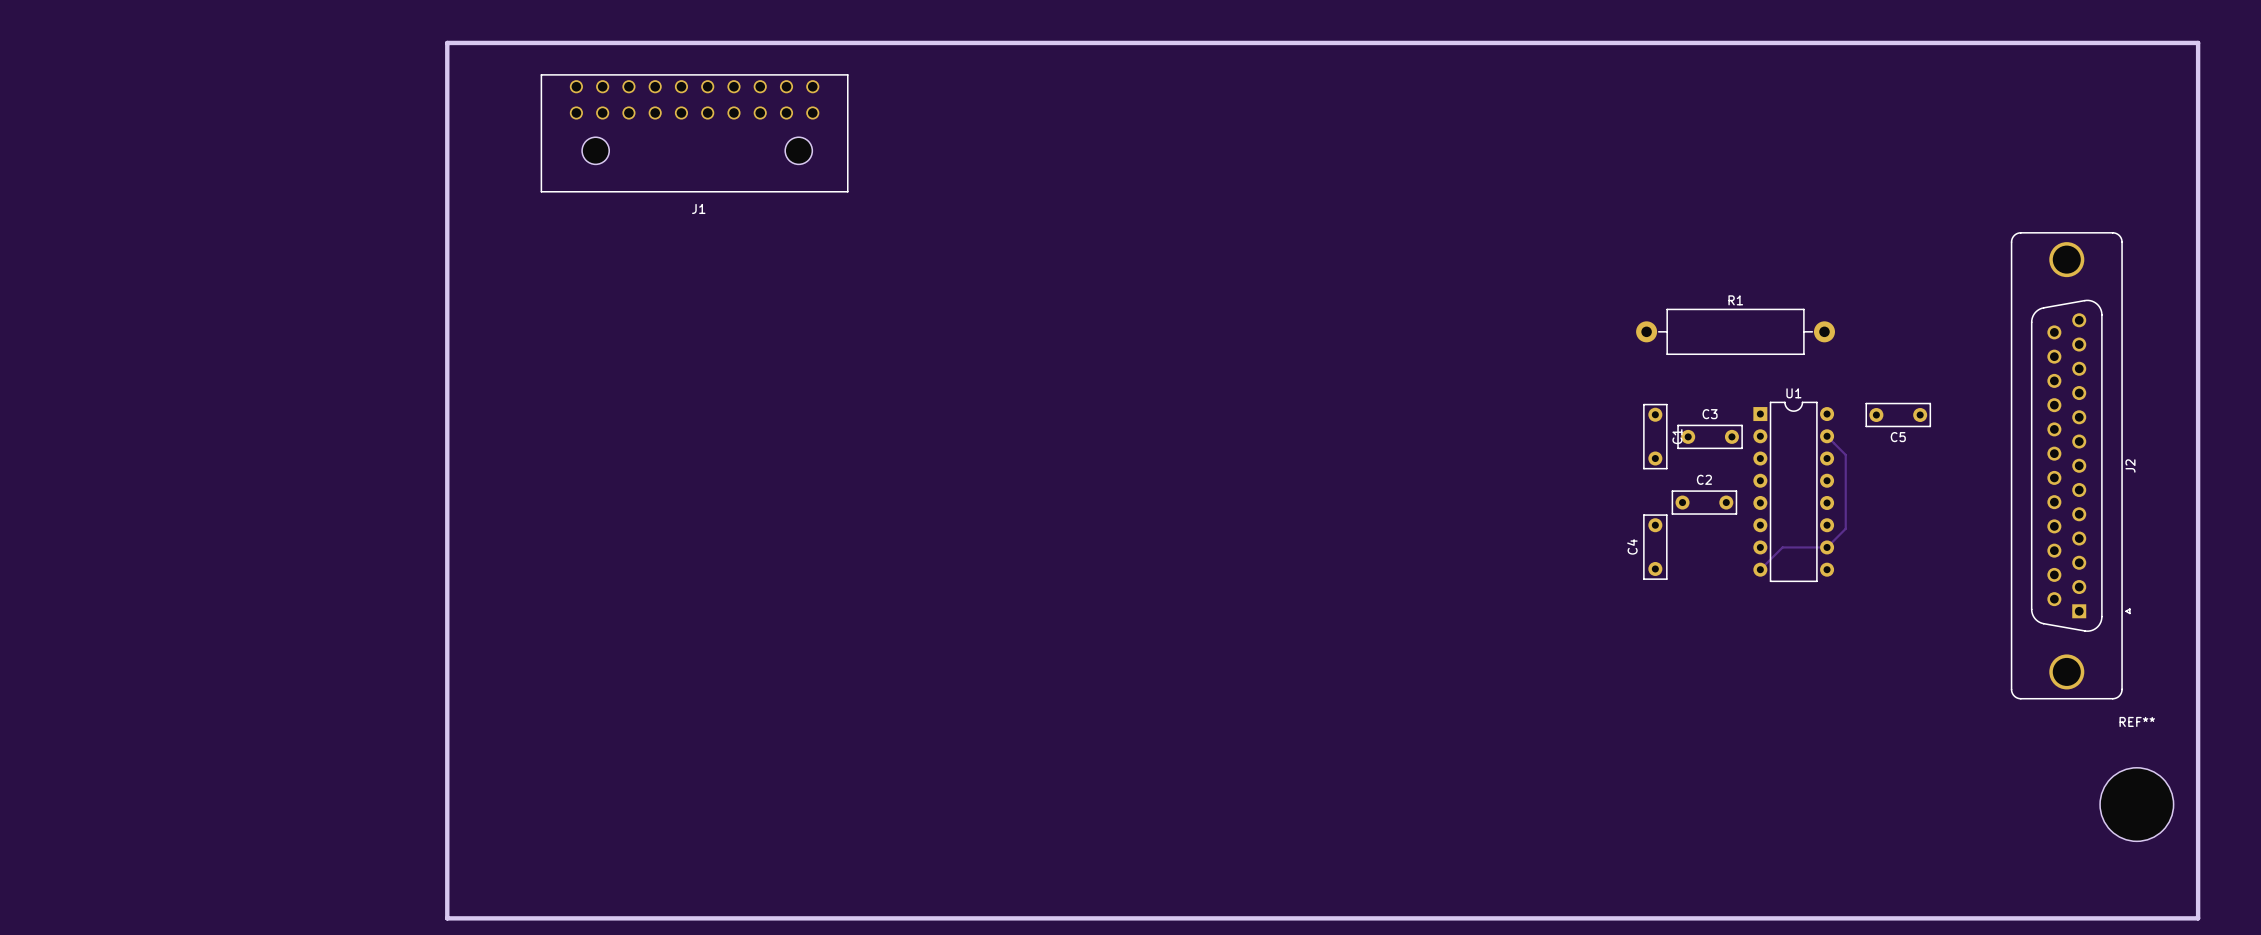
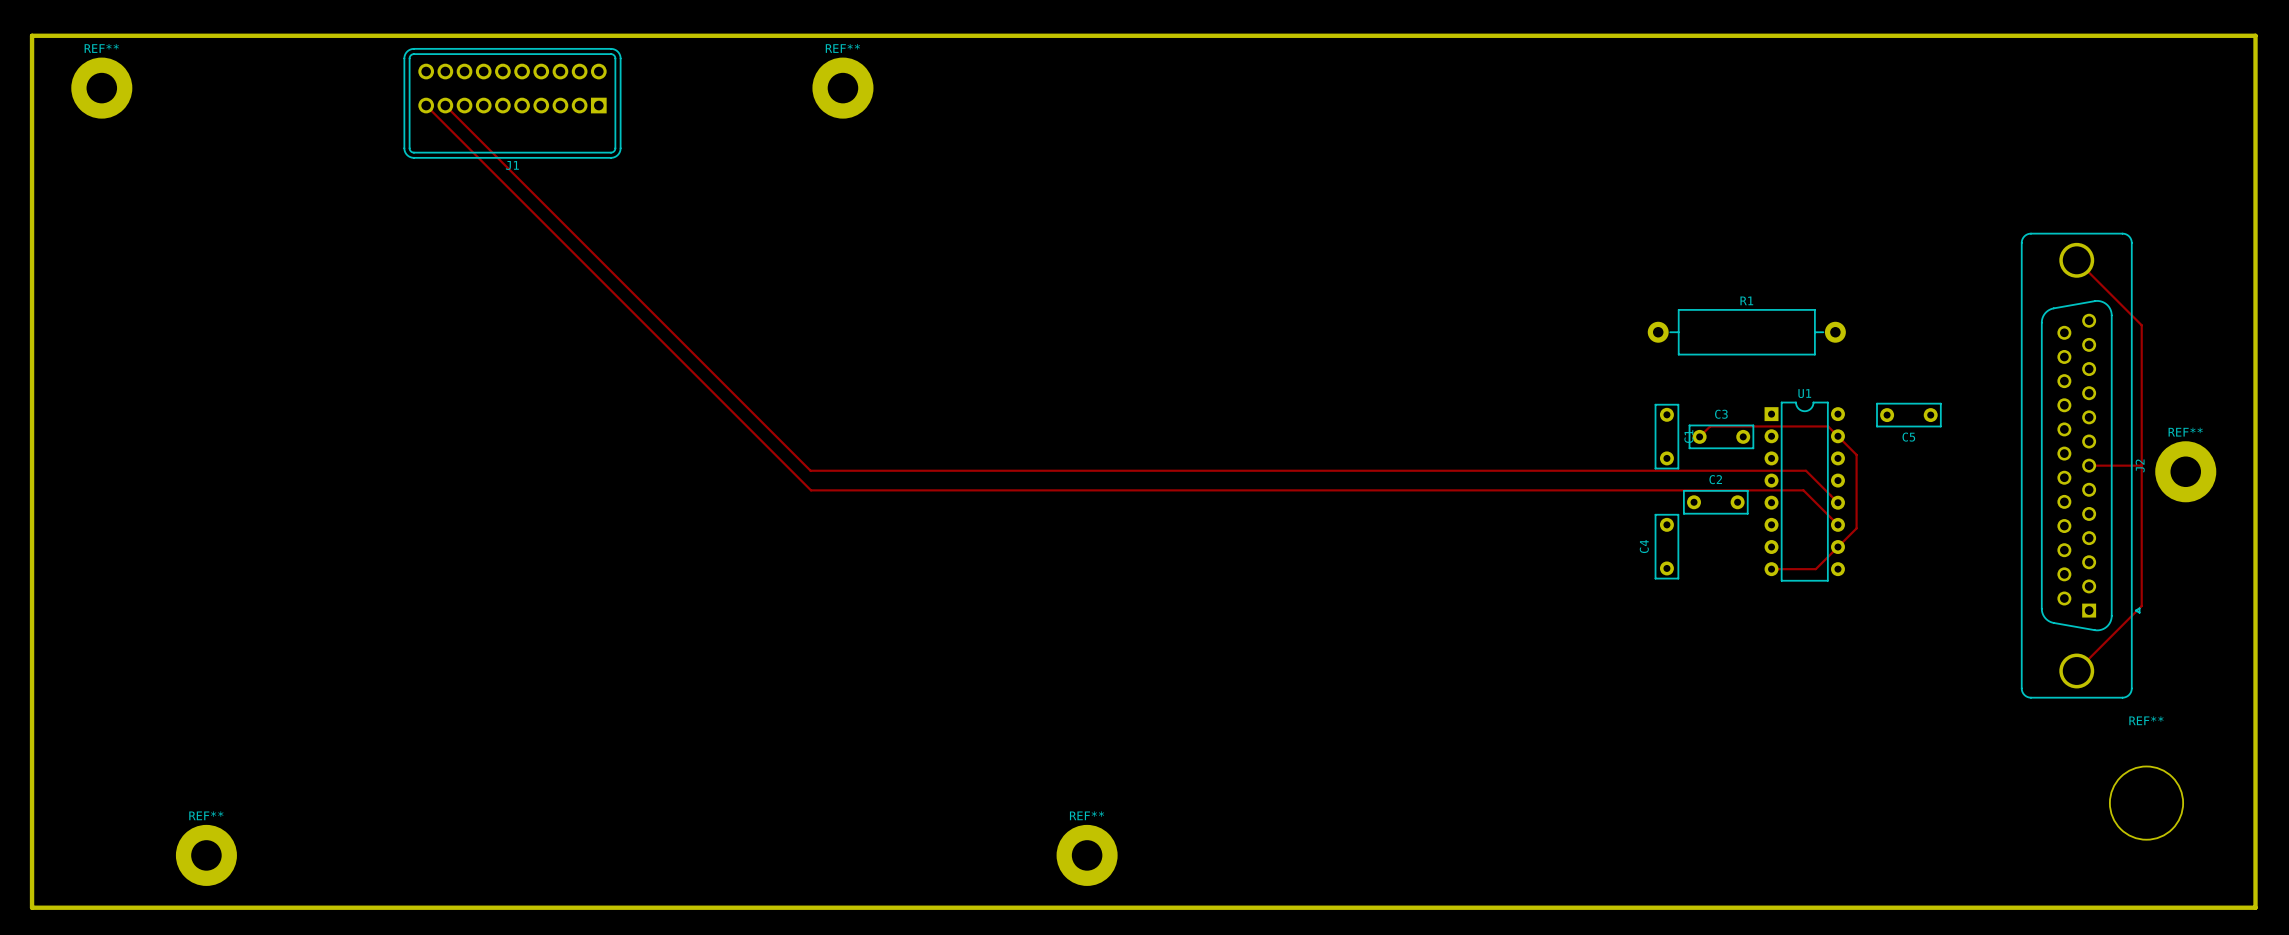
board edge: (447, 42) (2198, 42) (2198, 918) (447, 918) (447, 42) -> (32, 35) (32, 907) (2255, 907) (2255, 35) (32, 35)
J1 footprint: [540, 74, 849, 193] -> [403, 48, 622, 159]
REF**: none -> (101, 88)
REF**: none -> (842, 88)
track: none -> (426, 105) (811, 490) (1803, 490) (1837, 524)
track: none -> (445, 105) (810, 470) (1806, 470) (1837, 502)
track: none -> (2076, 260) (2141, 325) (2141, 606) (2076, 671)
track: none -> (1837, 436) (1828, 426) (1710, 426) (1699, 436)
track: none -> (2089, 465) (2141, 465)
REF**: none -> (2185, 471)
track: (1827, 547) (1782, 547) (1760, 569) -> (1837, 547) (1815, 569) (1771, 569)
REF**: none -> (206, 855)
REF**: none -> (1087, 855)

